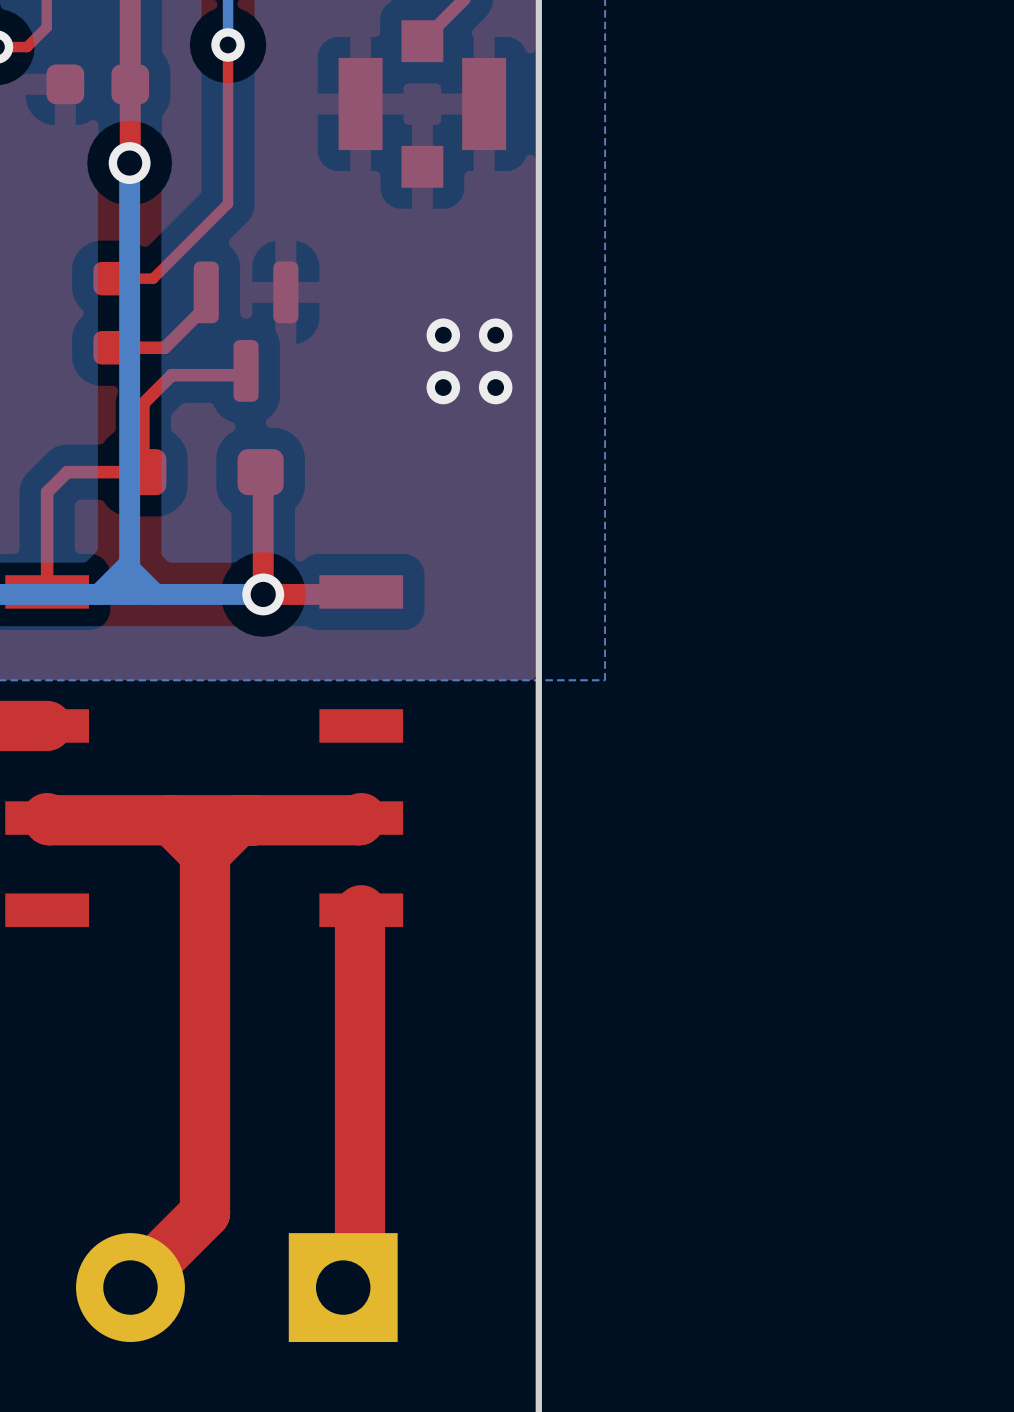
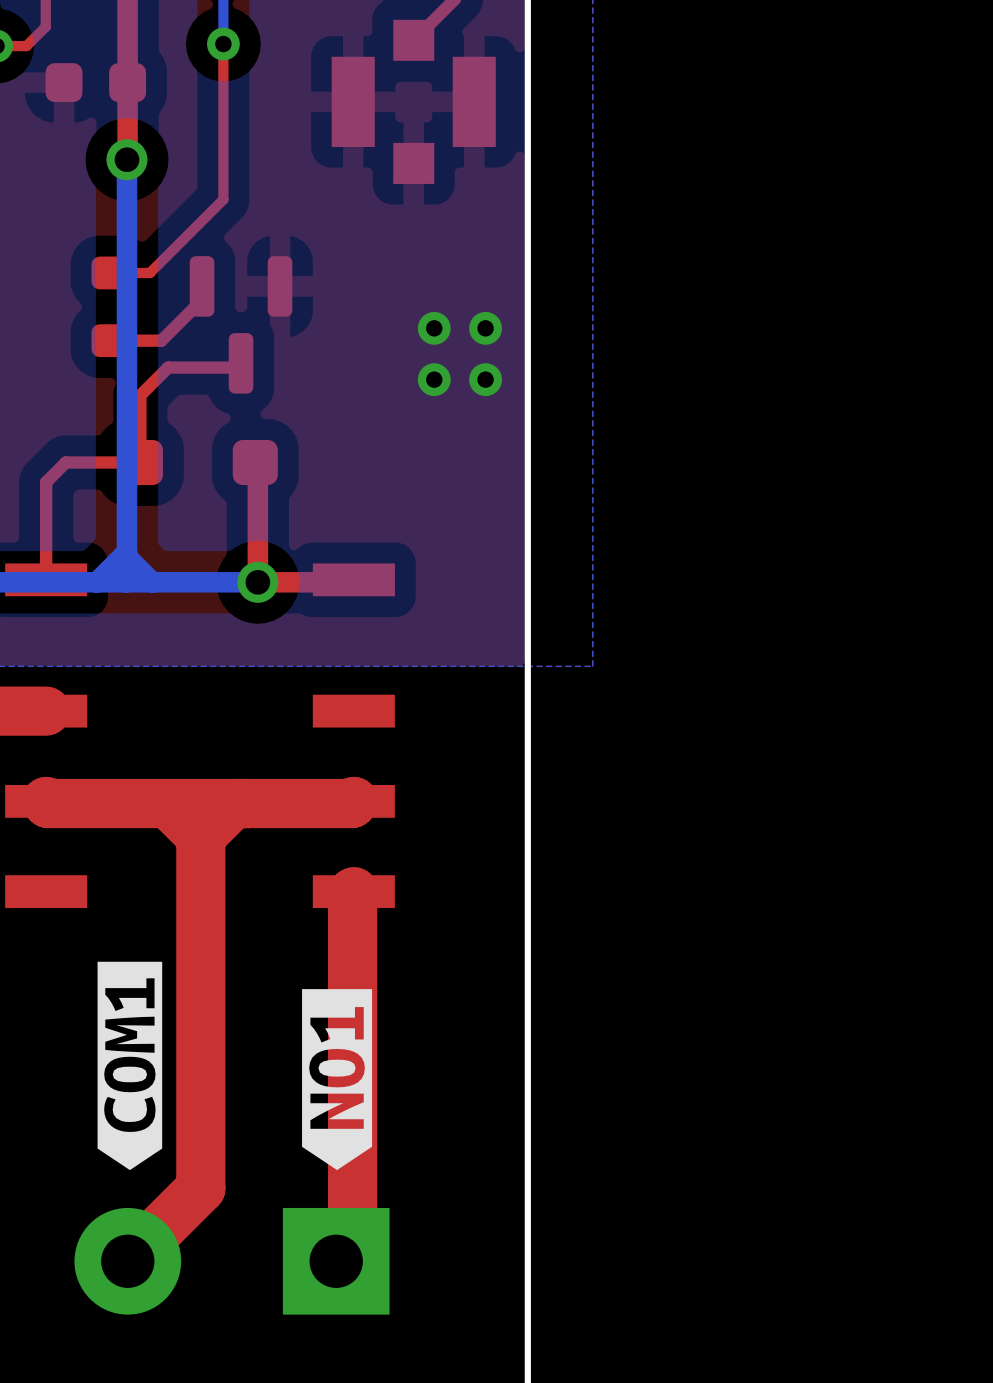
drawing: none -> [97, 961, 163, 1171]
drawing: none -> [302, 989, 373, 1171]

